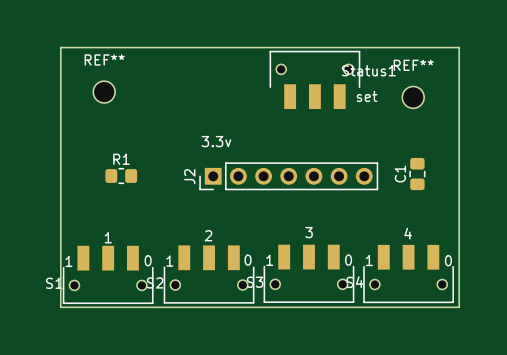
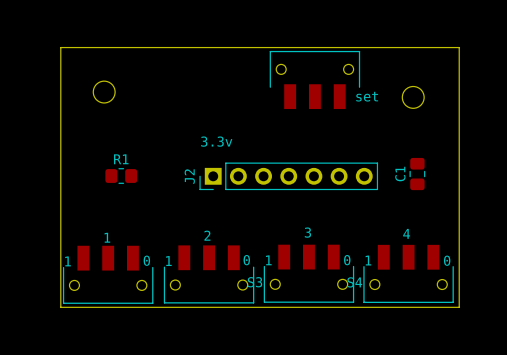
REF** name: REF** (104, 59) -> none
REF** name: REF** (413, 65) -> none
Status1 name: Status1 (368, 70) -> none
S2 name: S2 (155, 282) -> none
S1 name: S1 (54, 283) -> none

